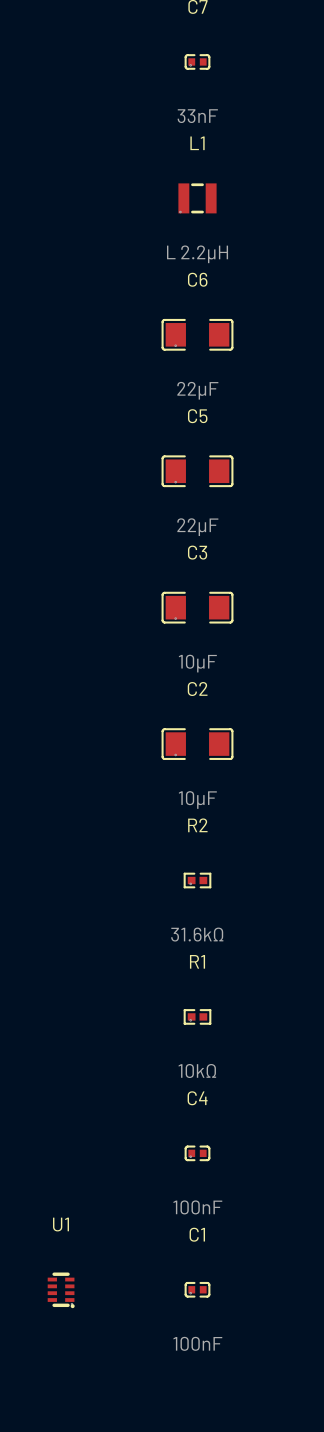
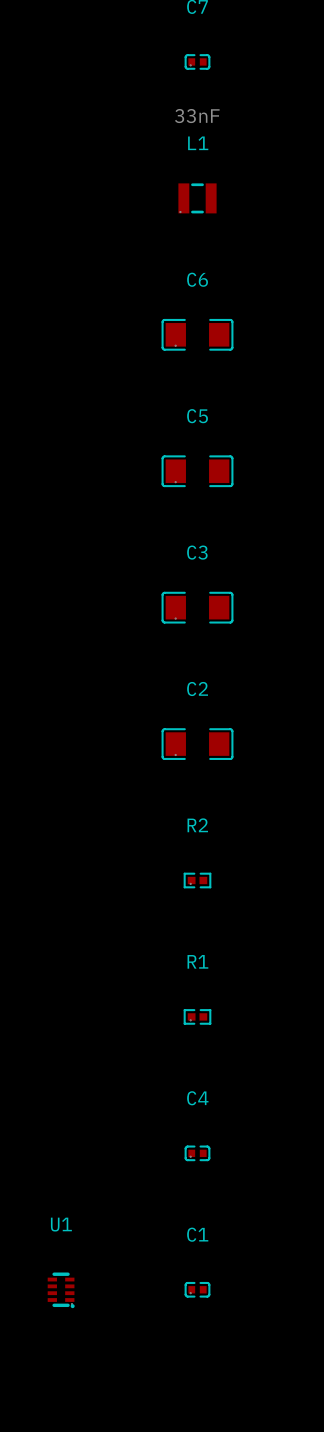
L1 value: L 2.2µH (197, 254) -> none
C6 value: 22µF (197, 390) -> none
C5 value: 22µF (197, 527) -> none
C3 value: 10µF (197, 663) -> none
C2 value: 10µF (197, 800) -> none
R2 value: 31.6kΩ (197, 934) -> none
R1 value: 10kΩ (197, 1070) -> none
C4 value: 100nF (197, 1207) -> none
C1 value: 100nF (197, 1343) -> none

